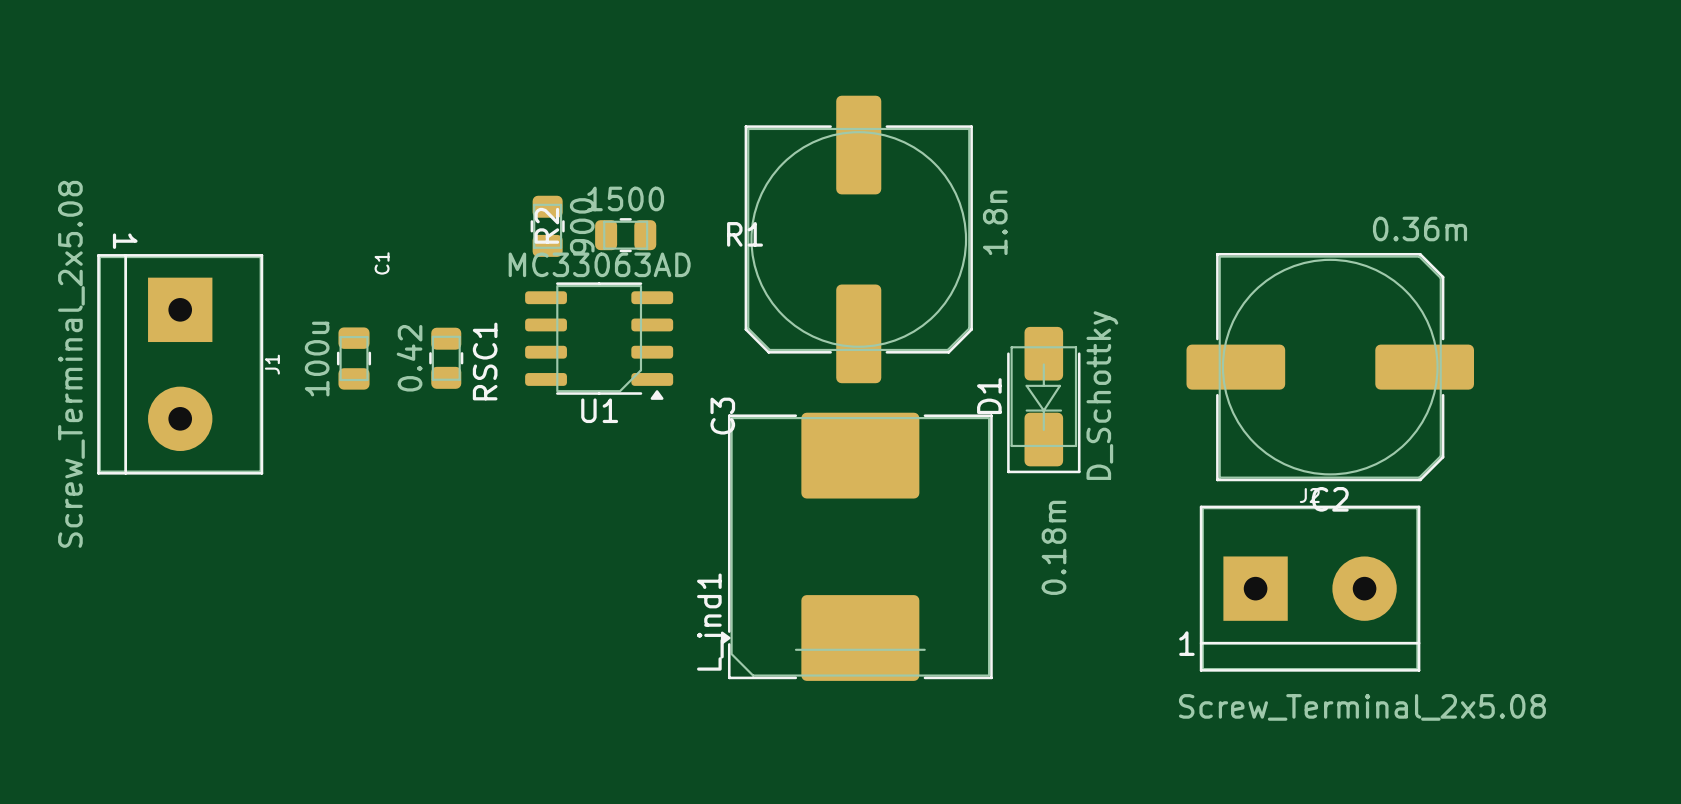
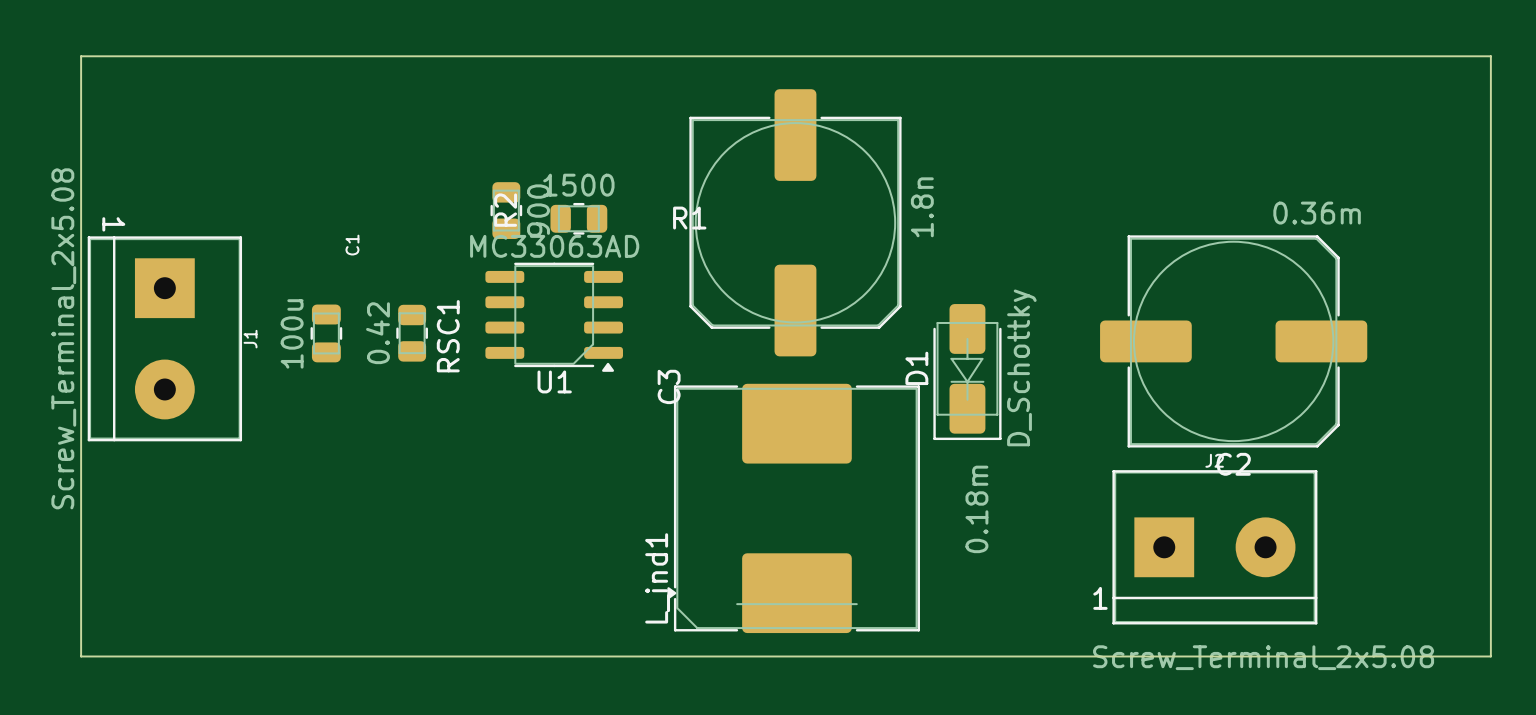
board edge: none -> (81, 56) (1490, 56) (1490, 656) (81, 656) (81, 56)

